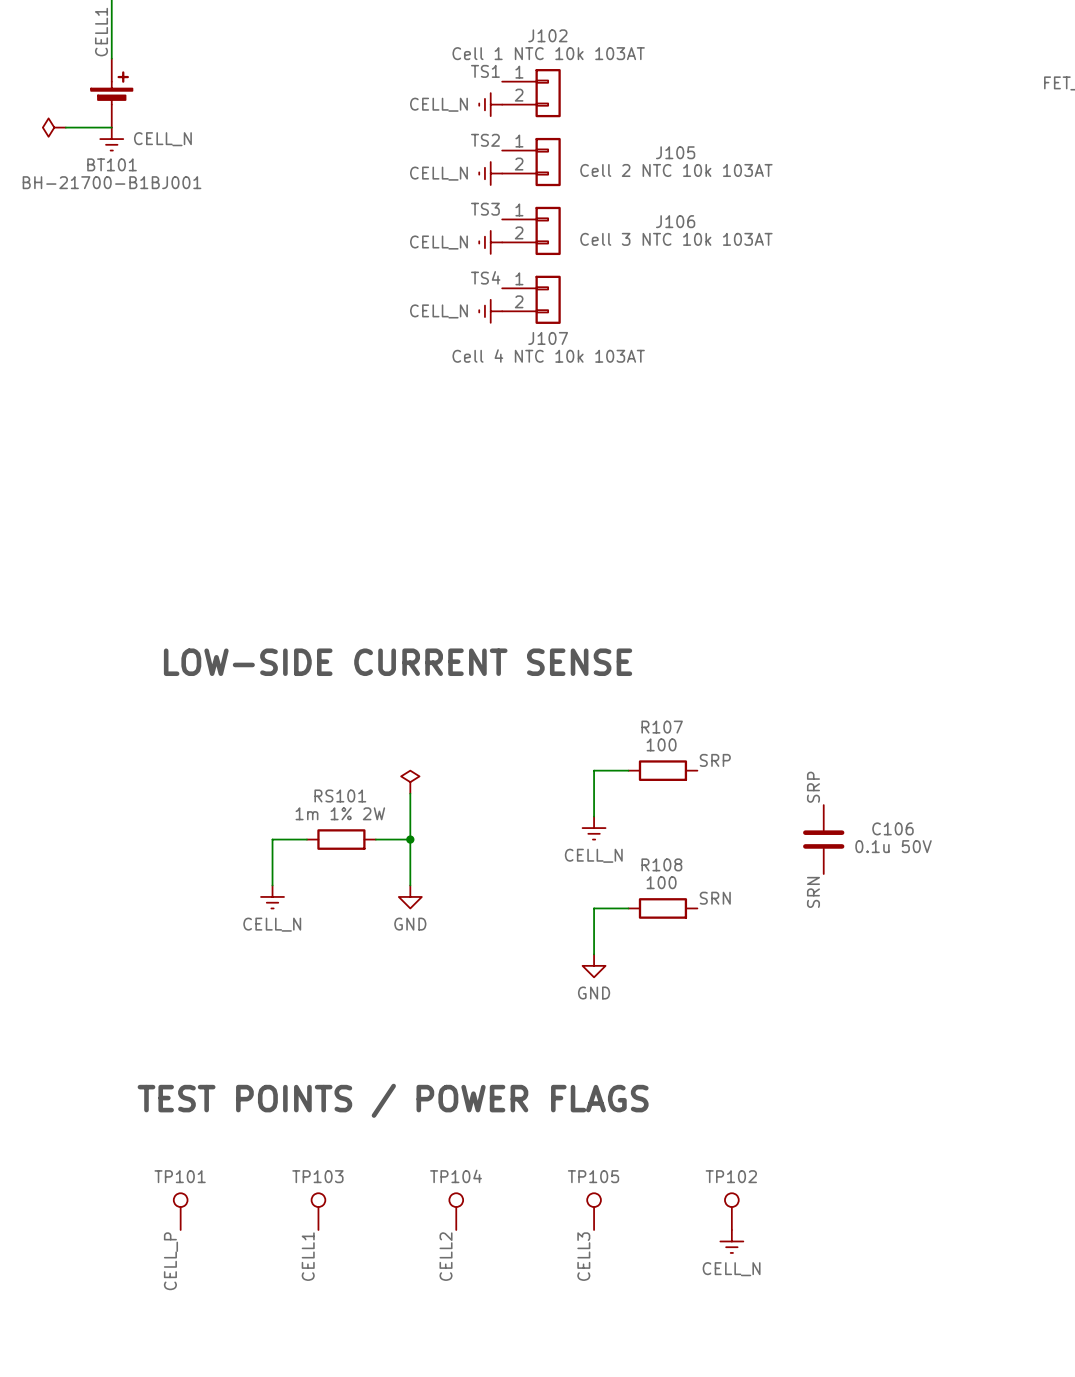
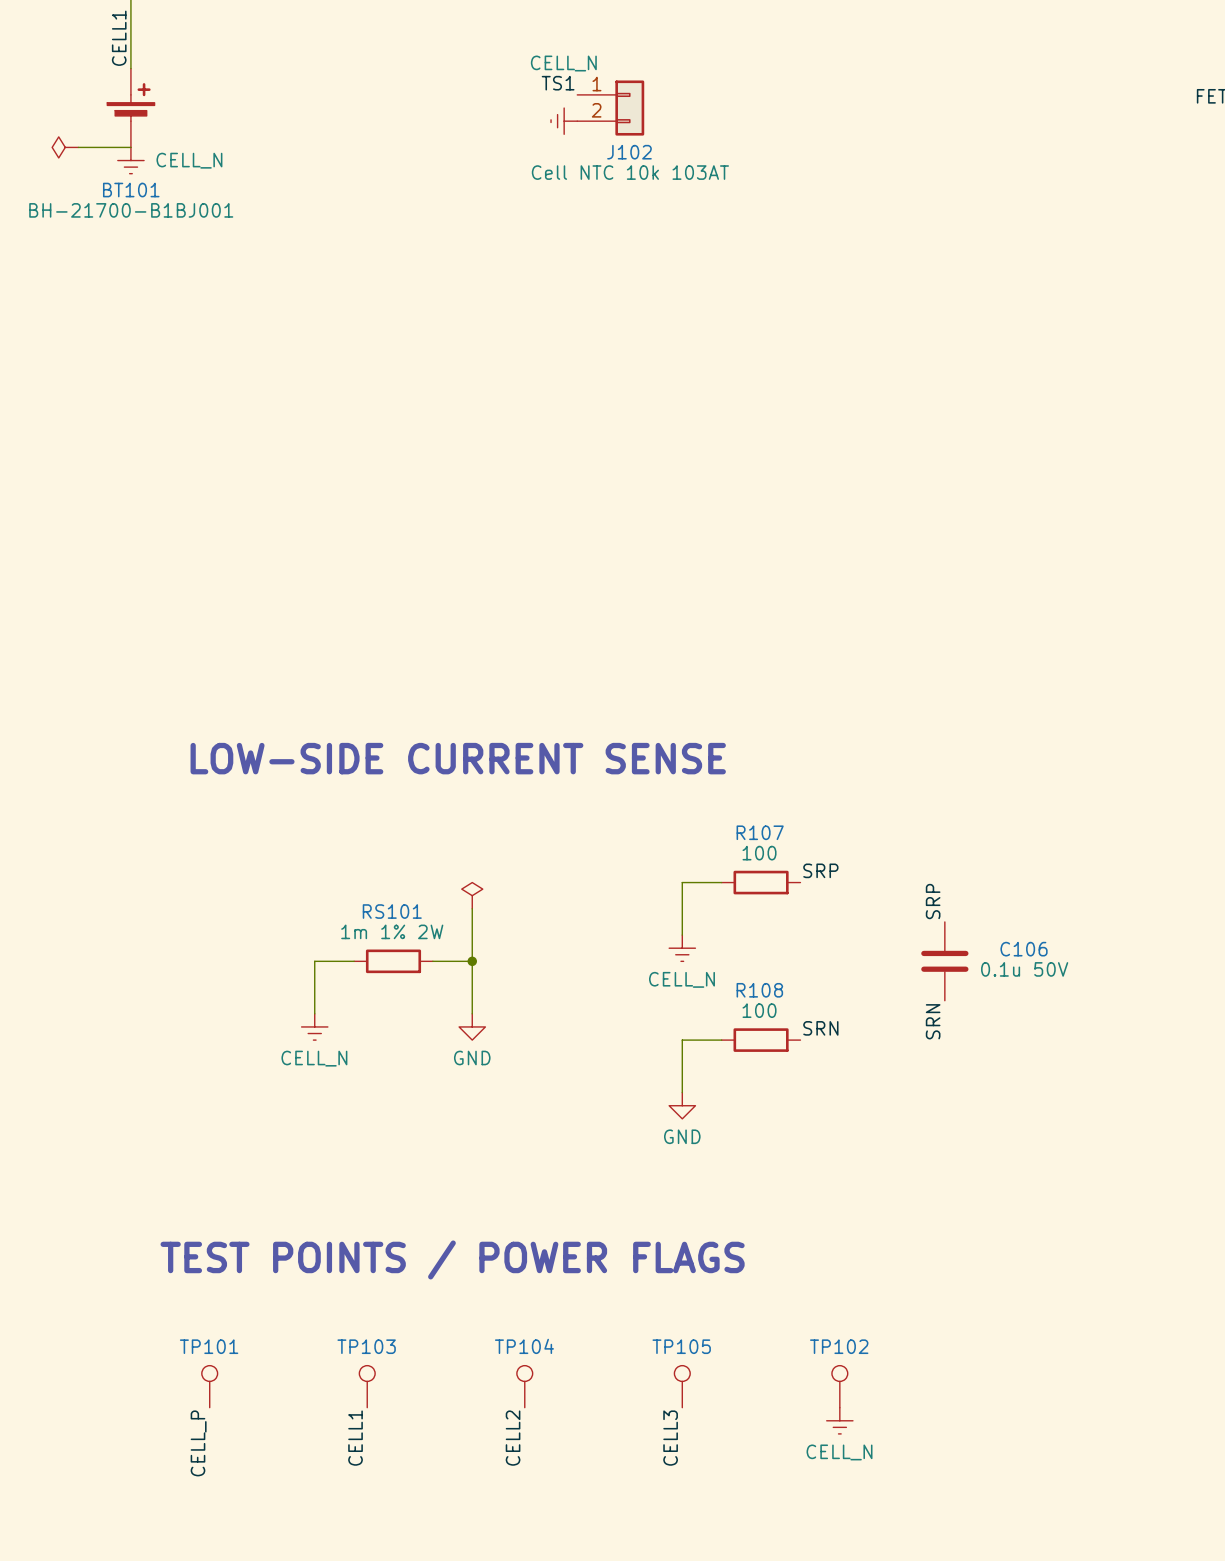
J102 name position: J102 (547, 35) -> J102 (629, 152)
J102 value: Cell 1 NTC 10k 103AT (548, 53) -> Cell NTC 10k 103AT (630, 172)
power symbol text position: CELL_N (438, 104) -> CELL_N (563, 63)
label: TS2 (485, 140) -> none
J105: Cell 2 NTC 10k 103AT (531, 162) -> none
power symbol: CELL_N (490, 173) -> none
label: TS3 (485, 209) -> none
J106: Cell 3 NTC 10k 103AT (531, 230) -> none
power symbol: CELL_N (490, 242) -> none
label: TS4 (485, 277) -> none
J107: Cell 4 NTC 10k 103AT (531, 299) -> none
power symbol: CELL_N (490, 311) -> none

